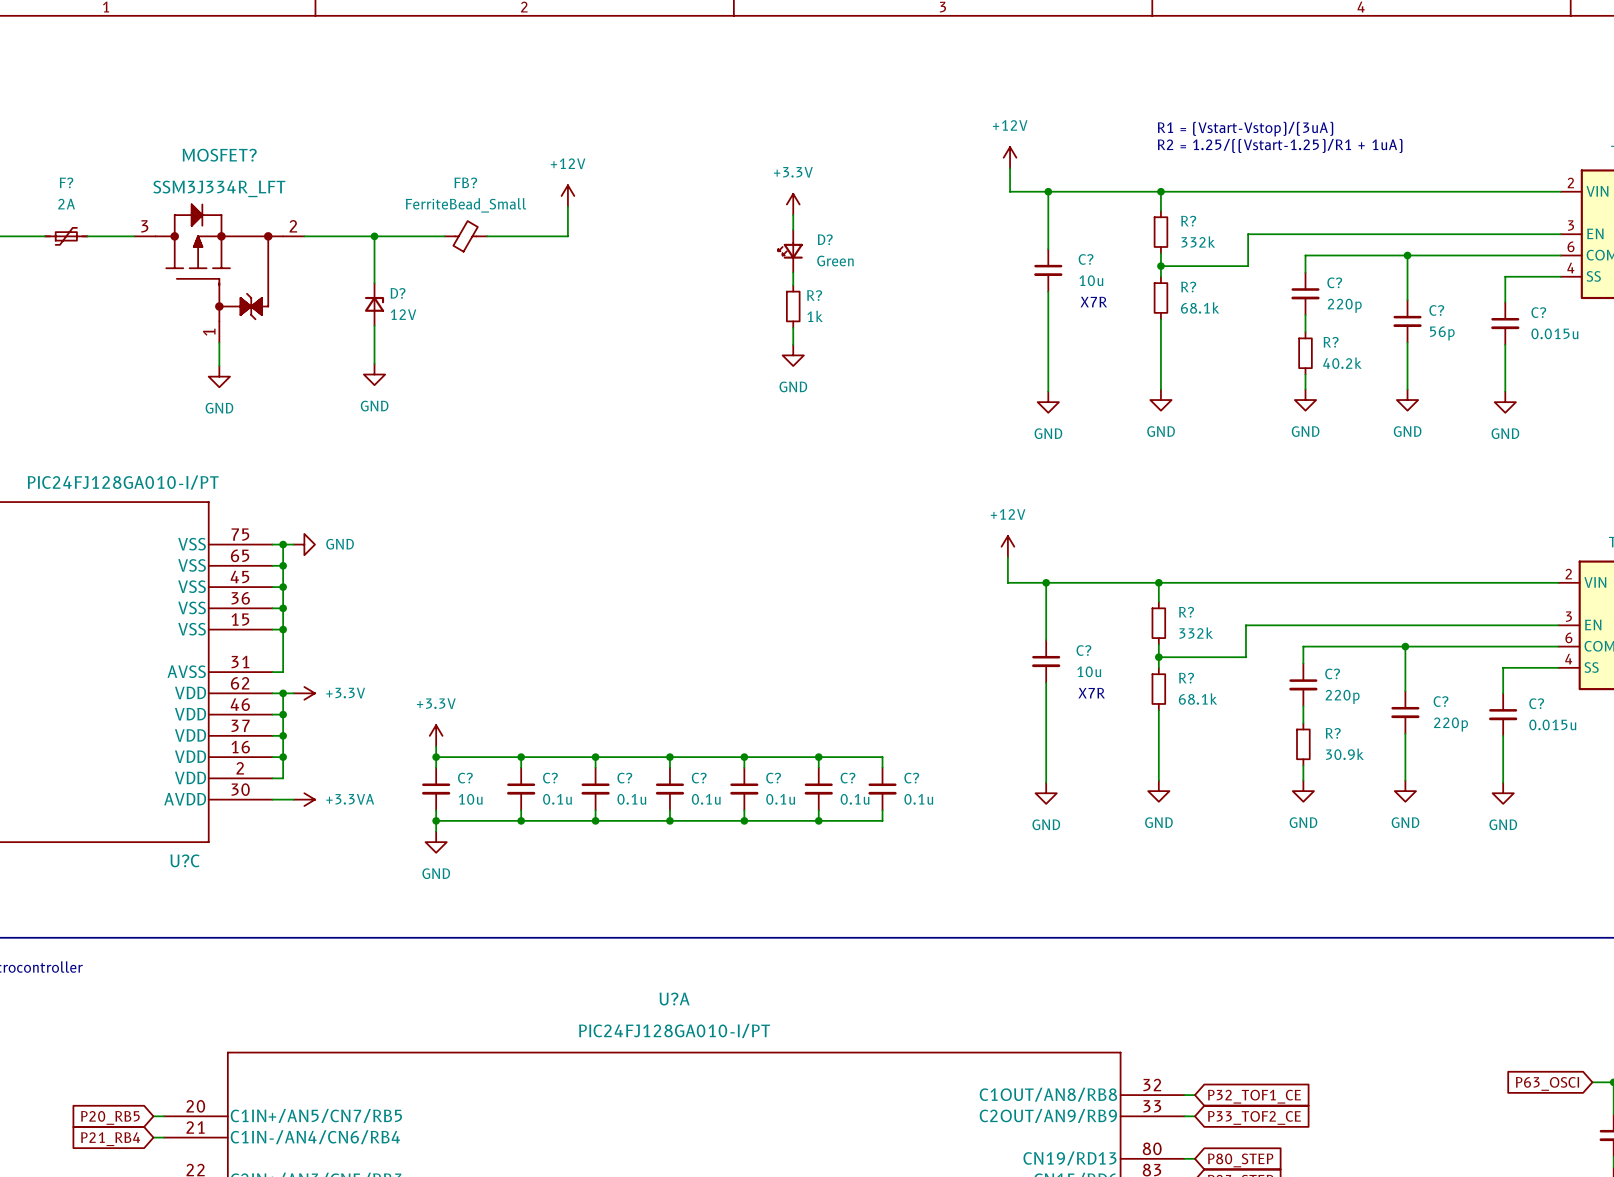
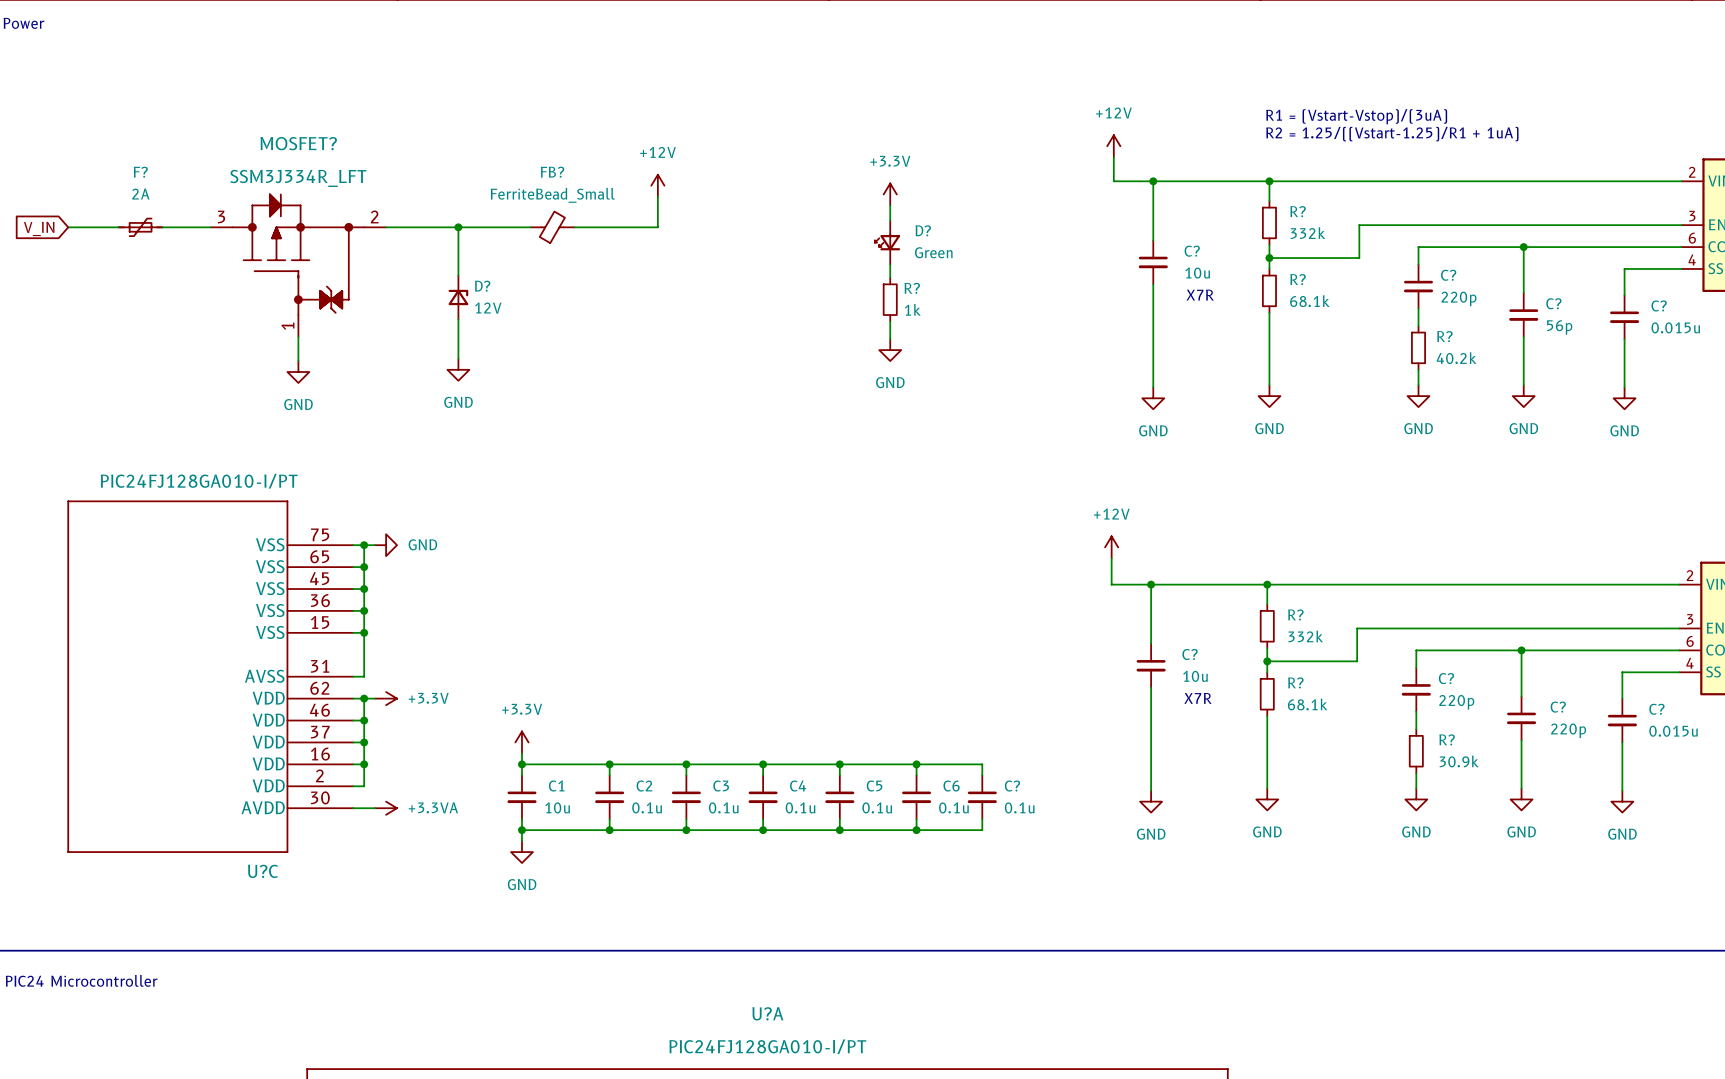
C? name: C? (465, 778) -> C1 (556, 786)
C? name: C? (550, 778) -> C2 (644, 786)
C? name: C? (624, 778) -> C3 (721, 786)
C? name: C? (699, 778) -> C4 (798, 786)
C? name: C? (773, 778) -> C5 (874, 786)
C? name: C? (848, 778) -> C6 (951, 786)

